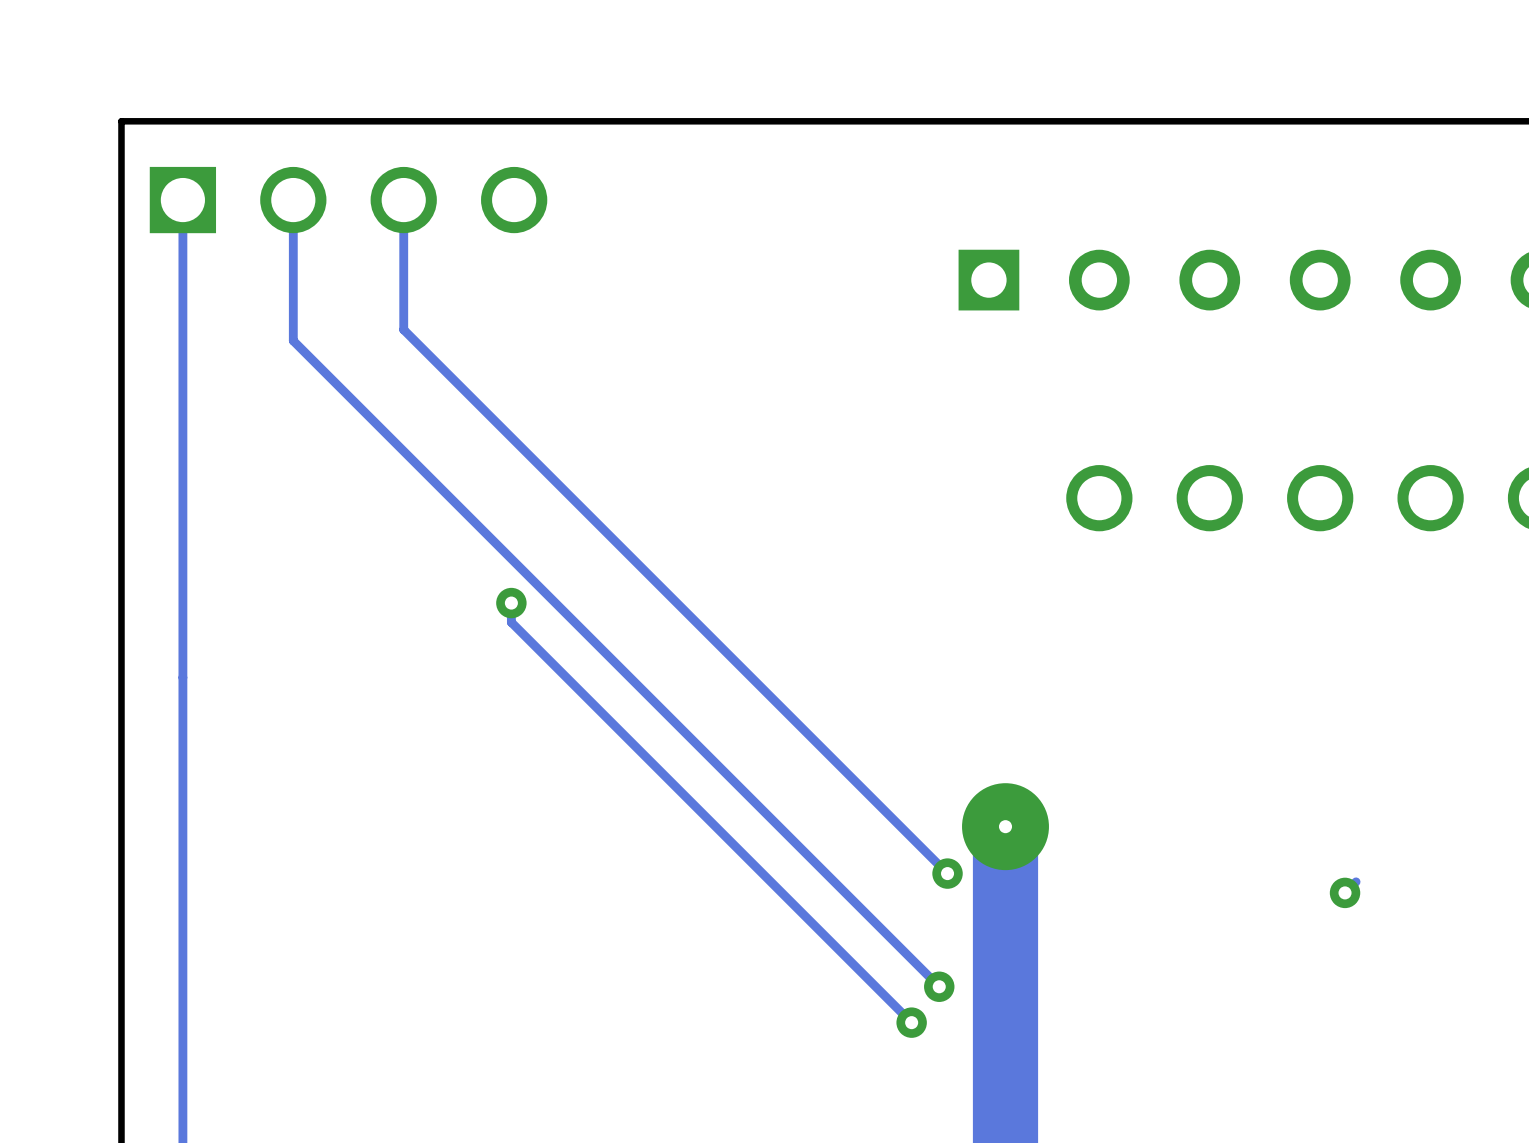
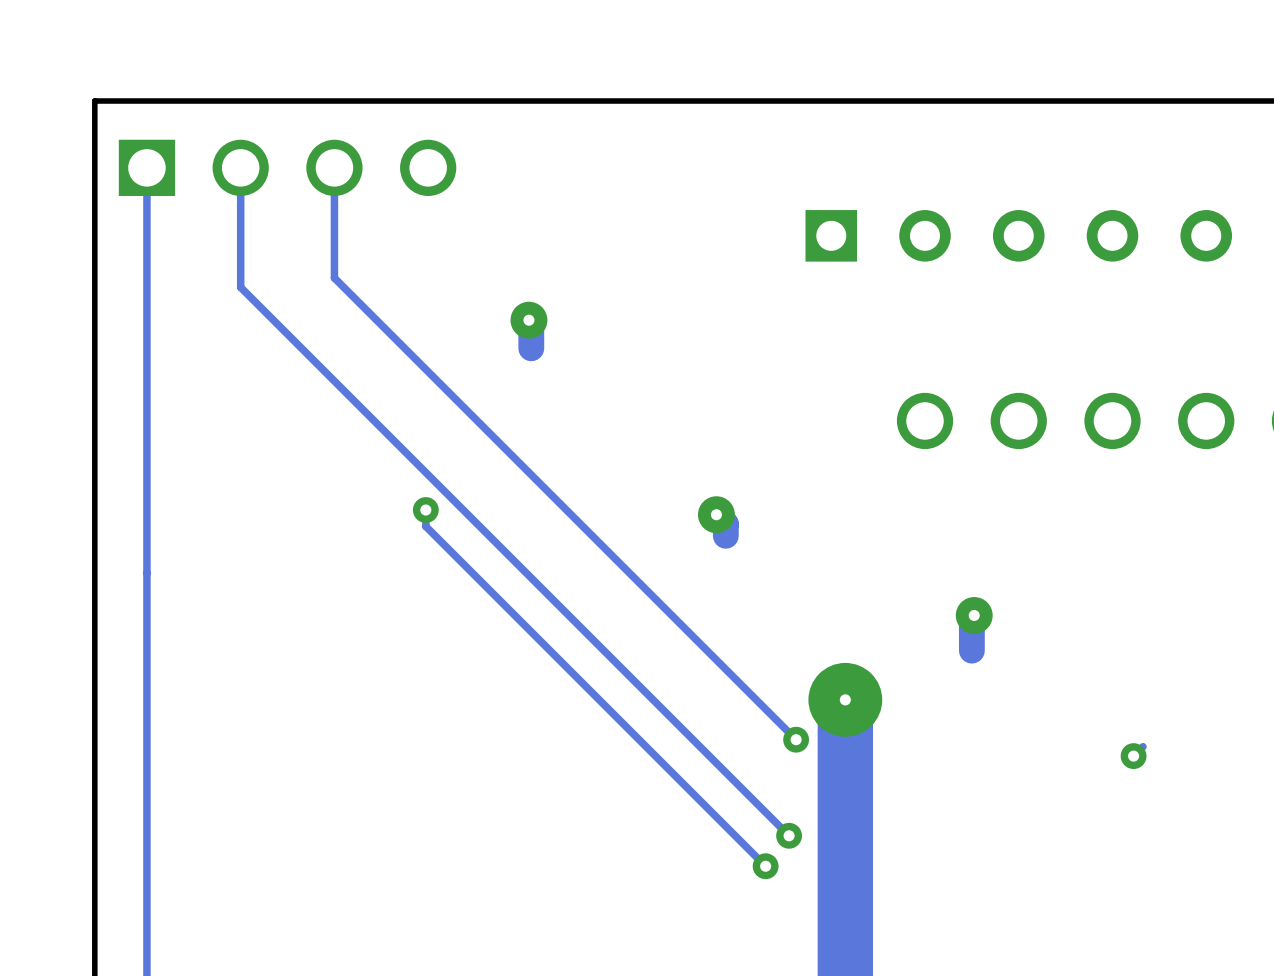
track: none -> (528, 320) (531, 322) (531, 348)
via: none -> (528, 320)
track: none -> (716, 514) (725, 524) (725, 535)
via: none -> (716, 514)
track: none -> (974, 615) (971, 617) (971, 650)
via: none -> (974, 615)

